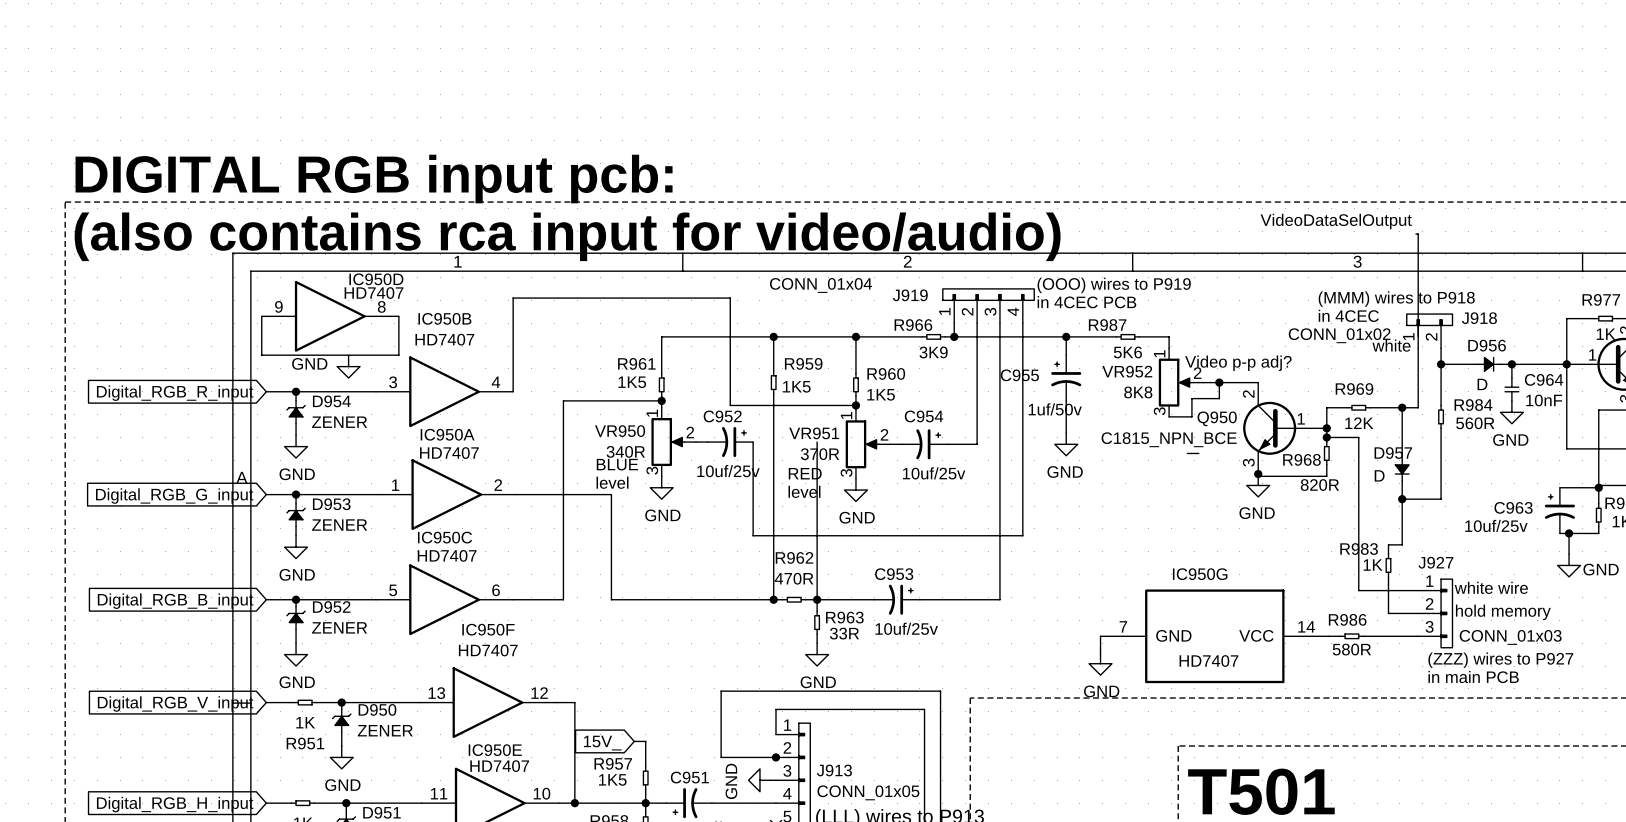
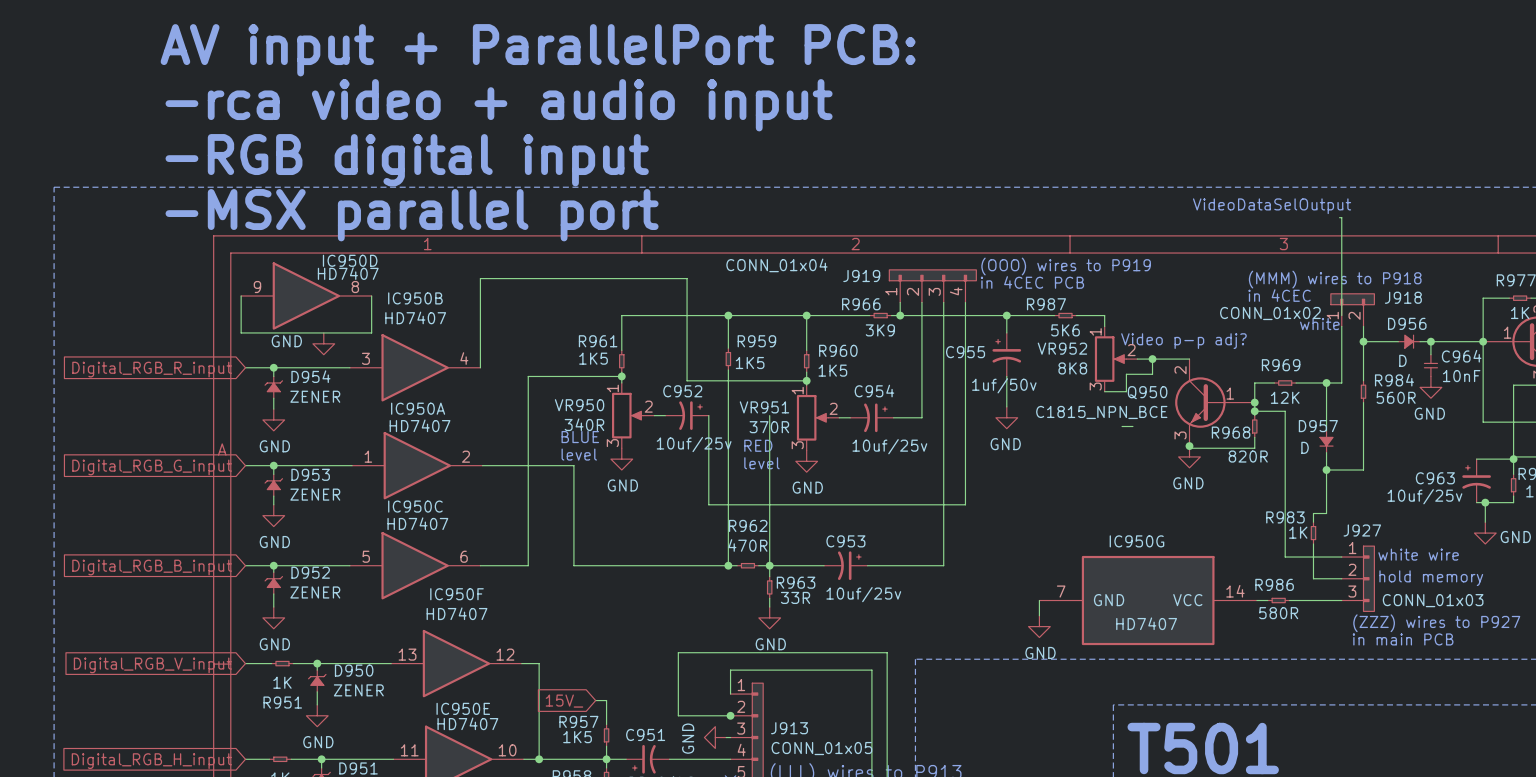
text: none -> AV input + ParallelPort PCB: (538, 50)
text: none -> -rca video + audio input (499, 105)
text: none -> -RGB digital input (407, 160)
text: DIGITAL RGB input pcb: (374, 179) -> none
text: none -> -MSX parallel port (412, 215)
text: (also contains rca input for video/audio) (567, 236) -> none

